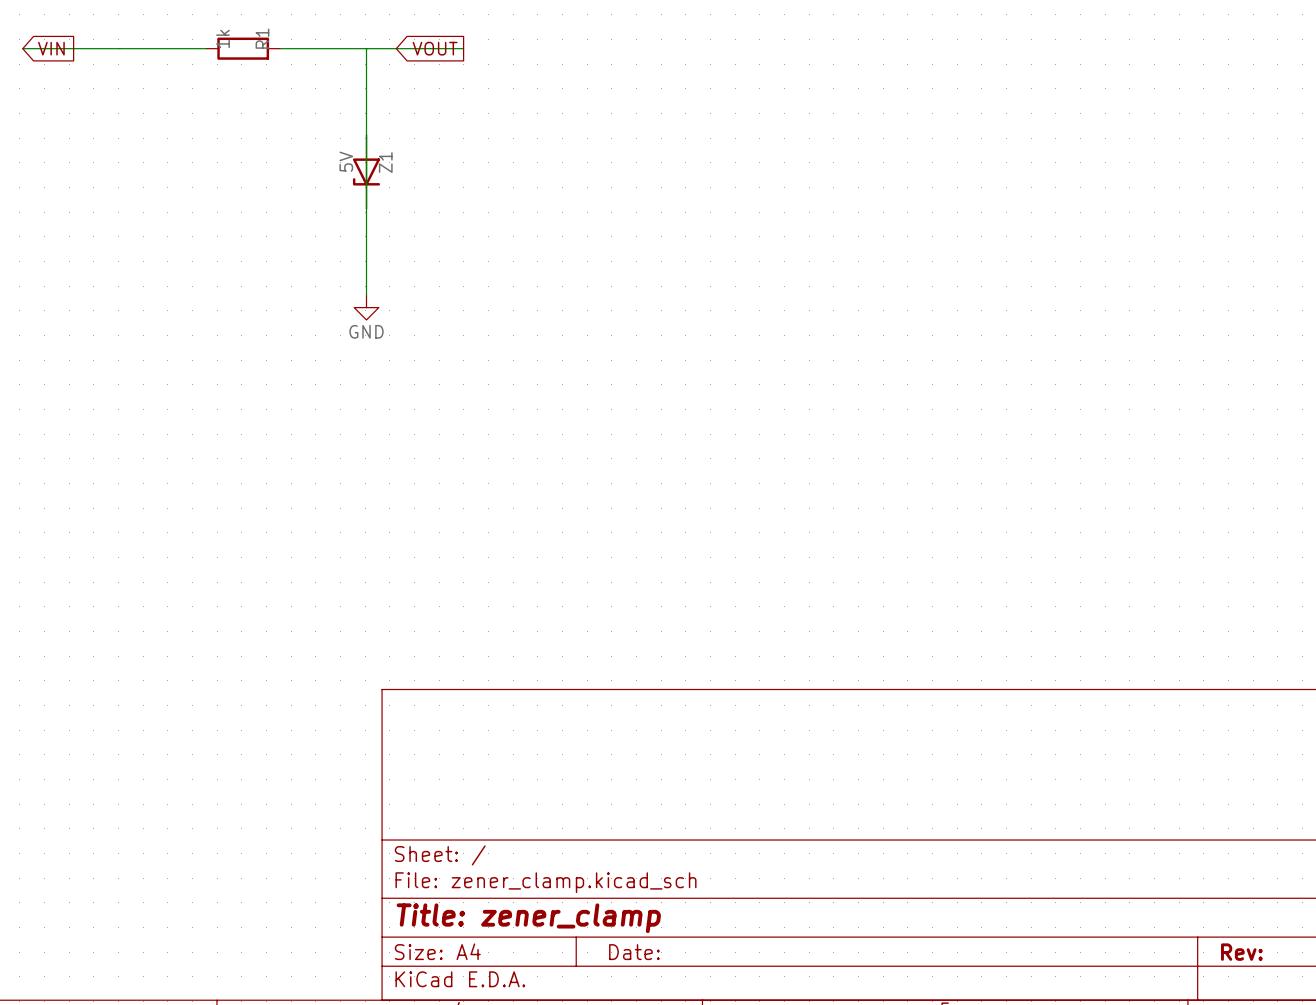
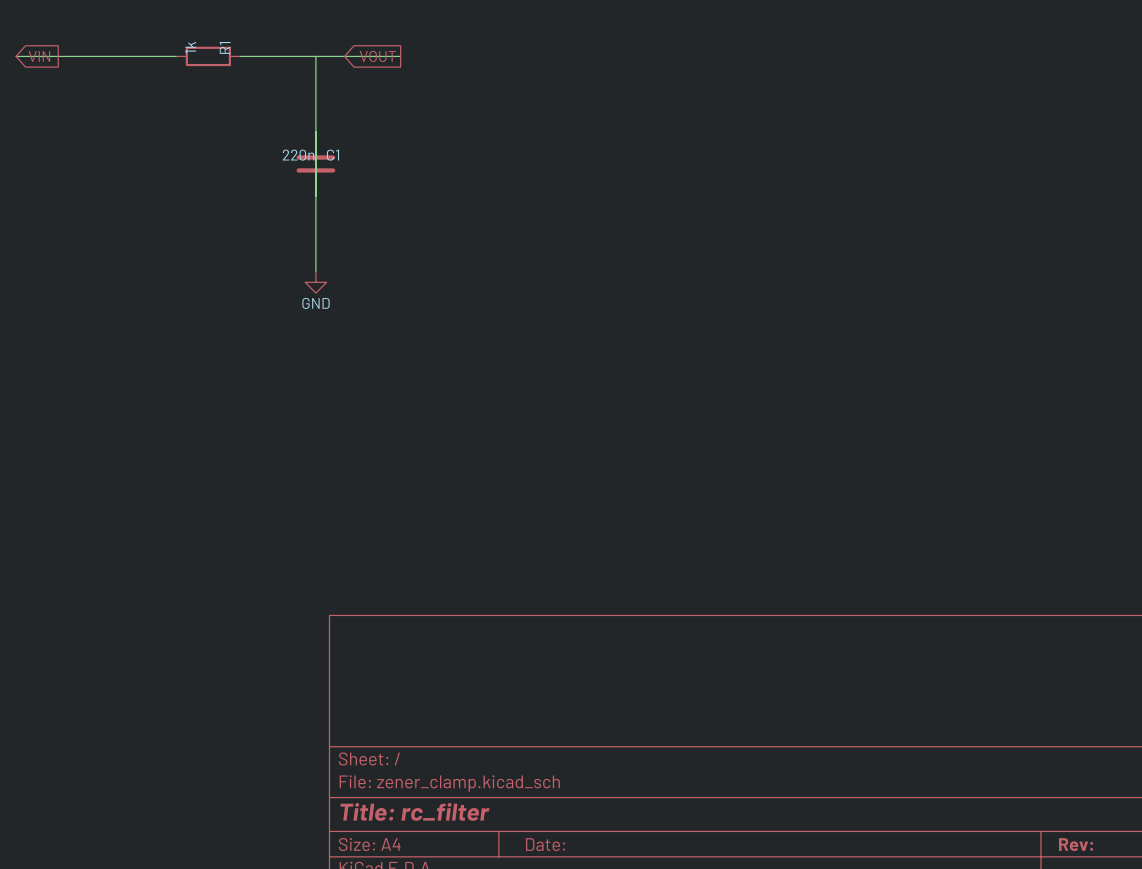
Z1: 5V (366, 171) -> none
C1: none -> 220n (315, 163)
title block: Title: zener_clamp (528, 918) -> Title: rc_filter (414, 811)

